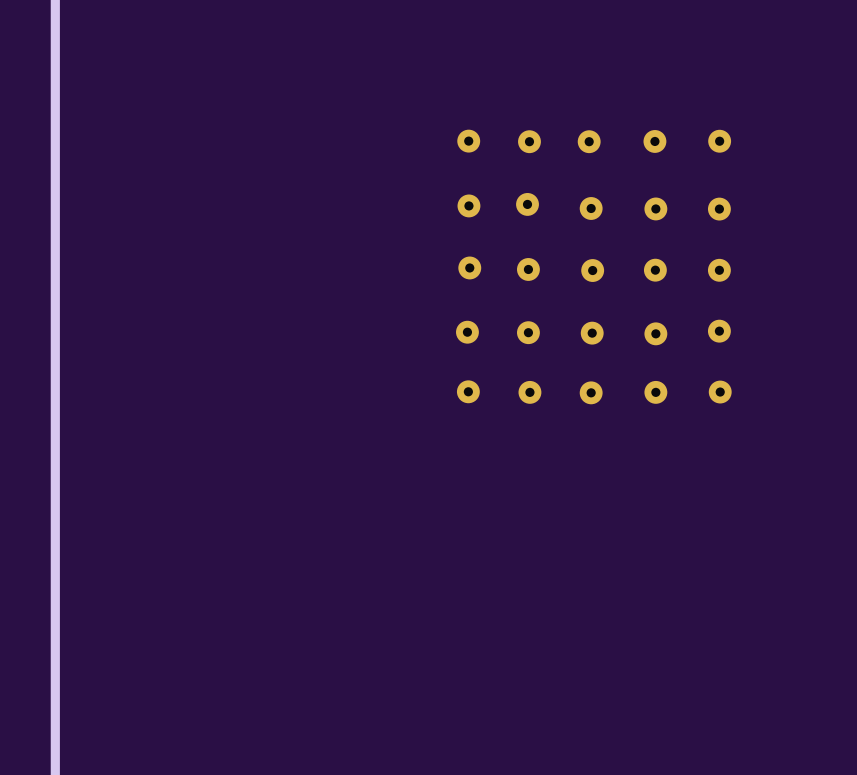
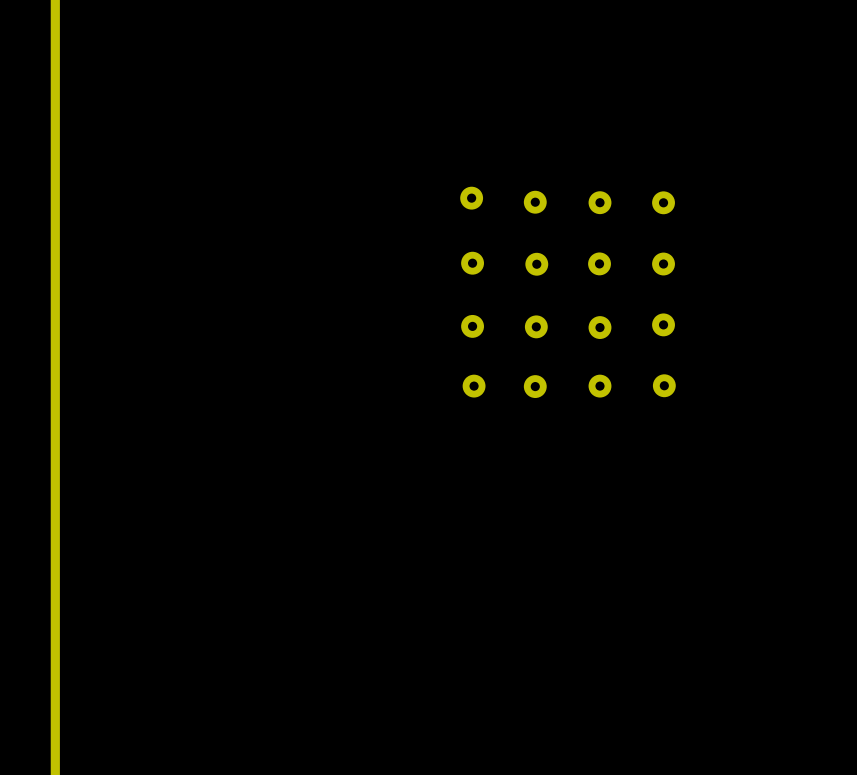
part footprint: [456, 129, 732, 405] -> [460, 186, 676, 399]

